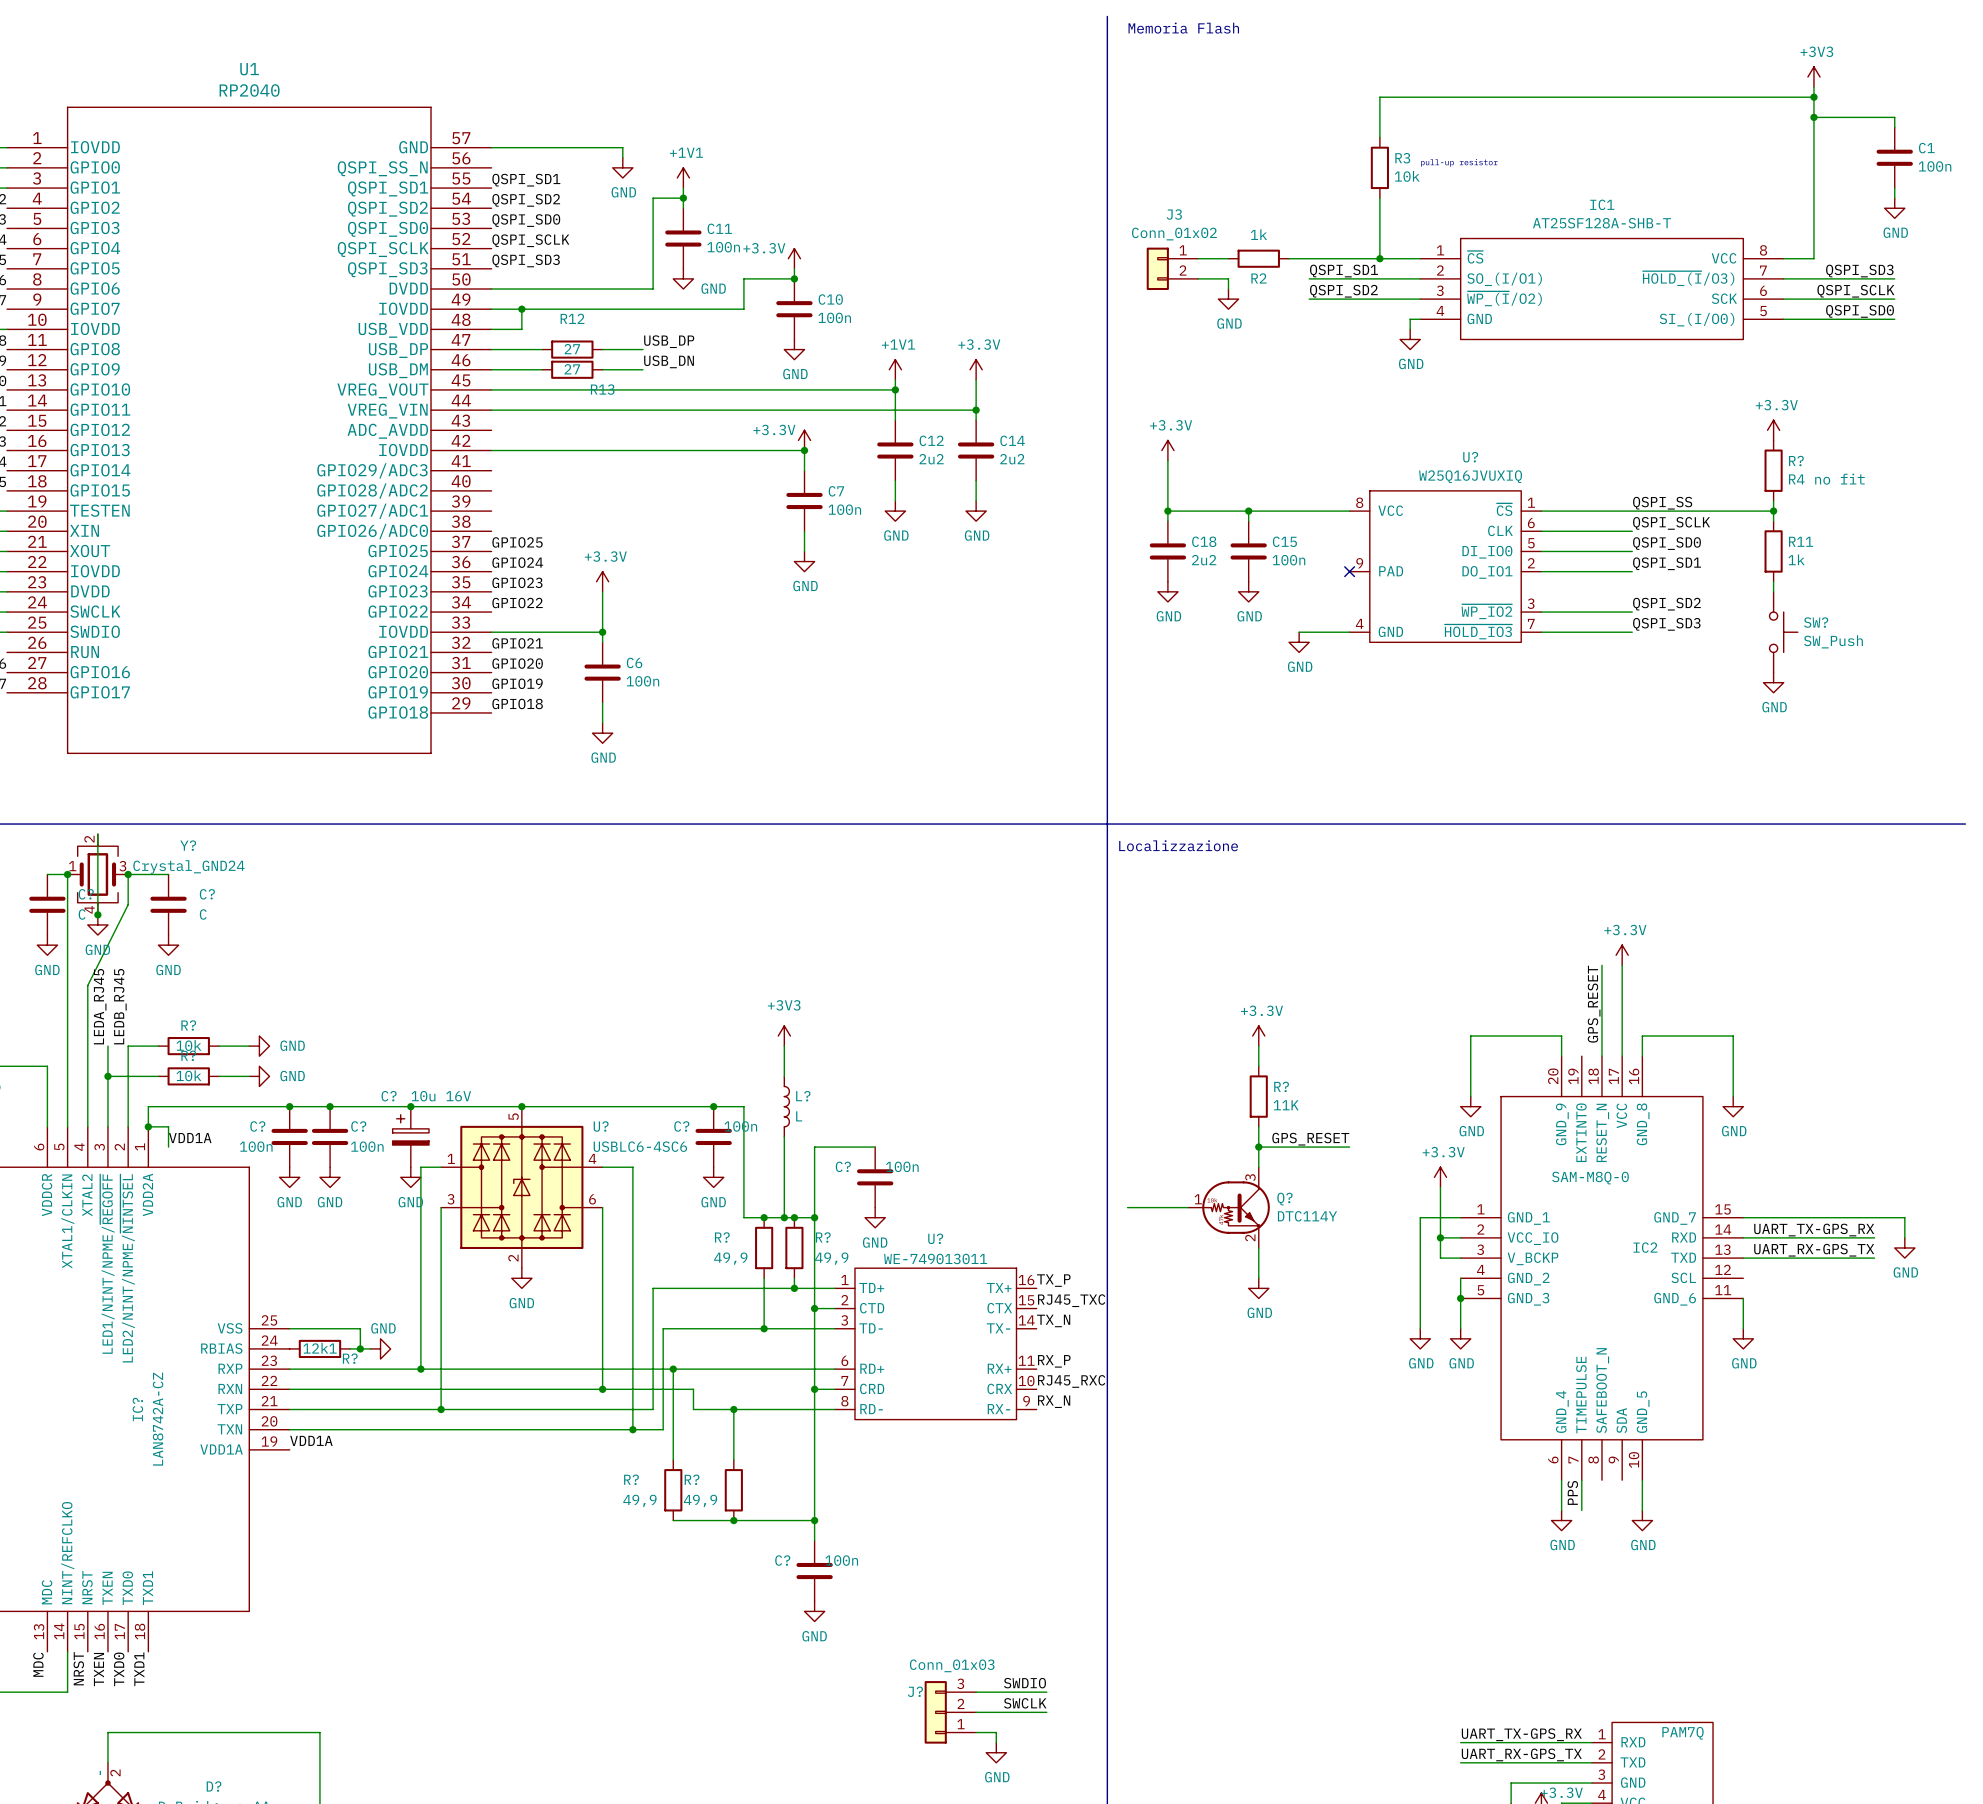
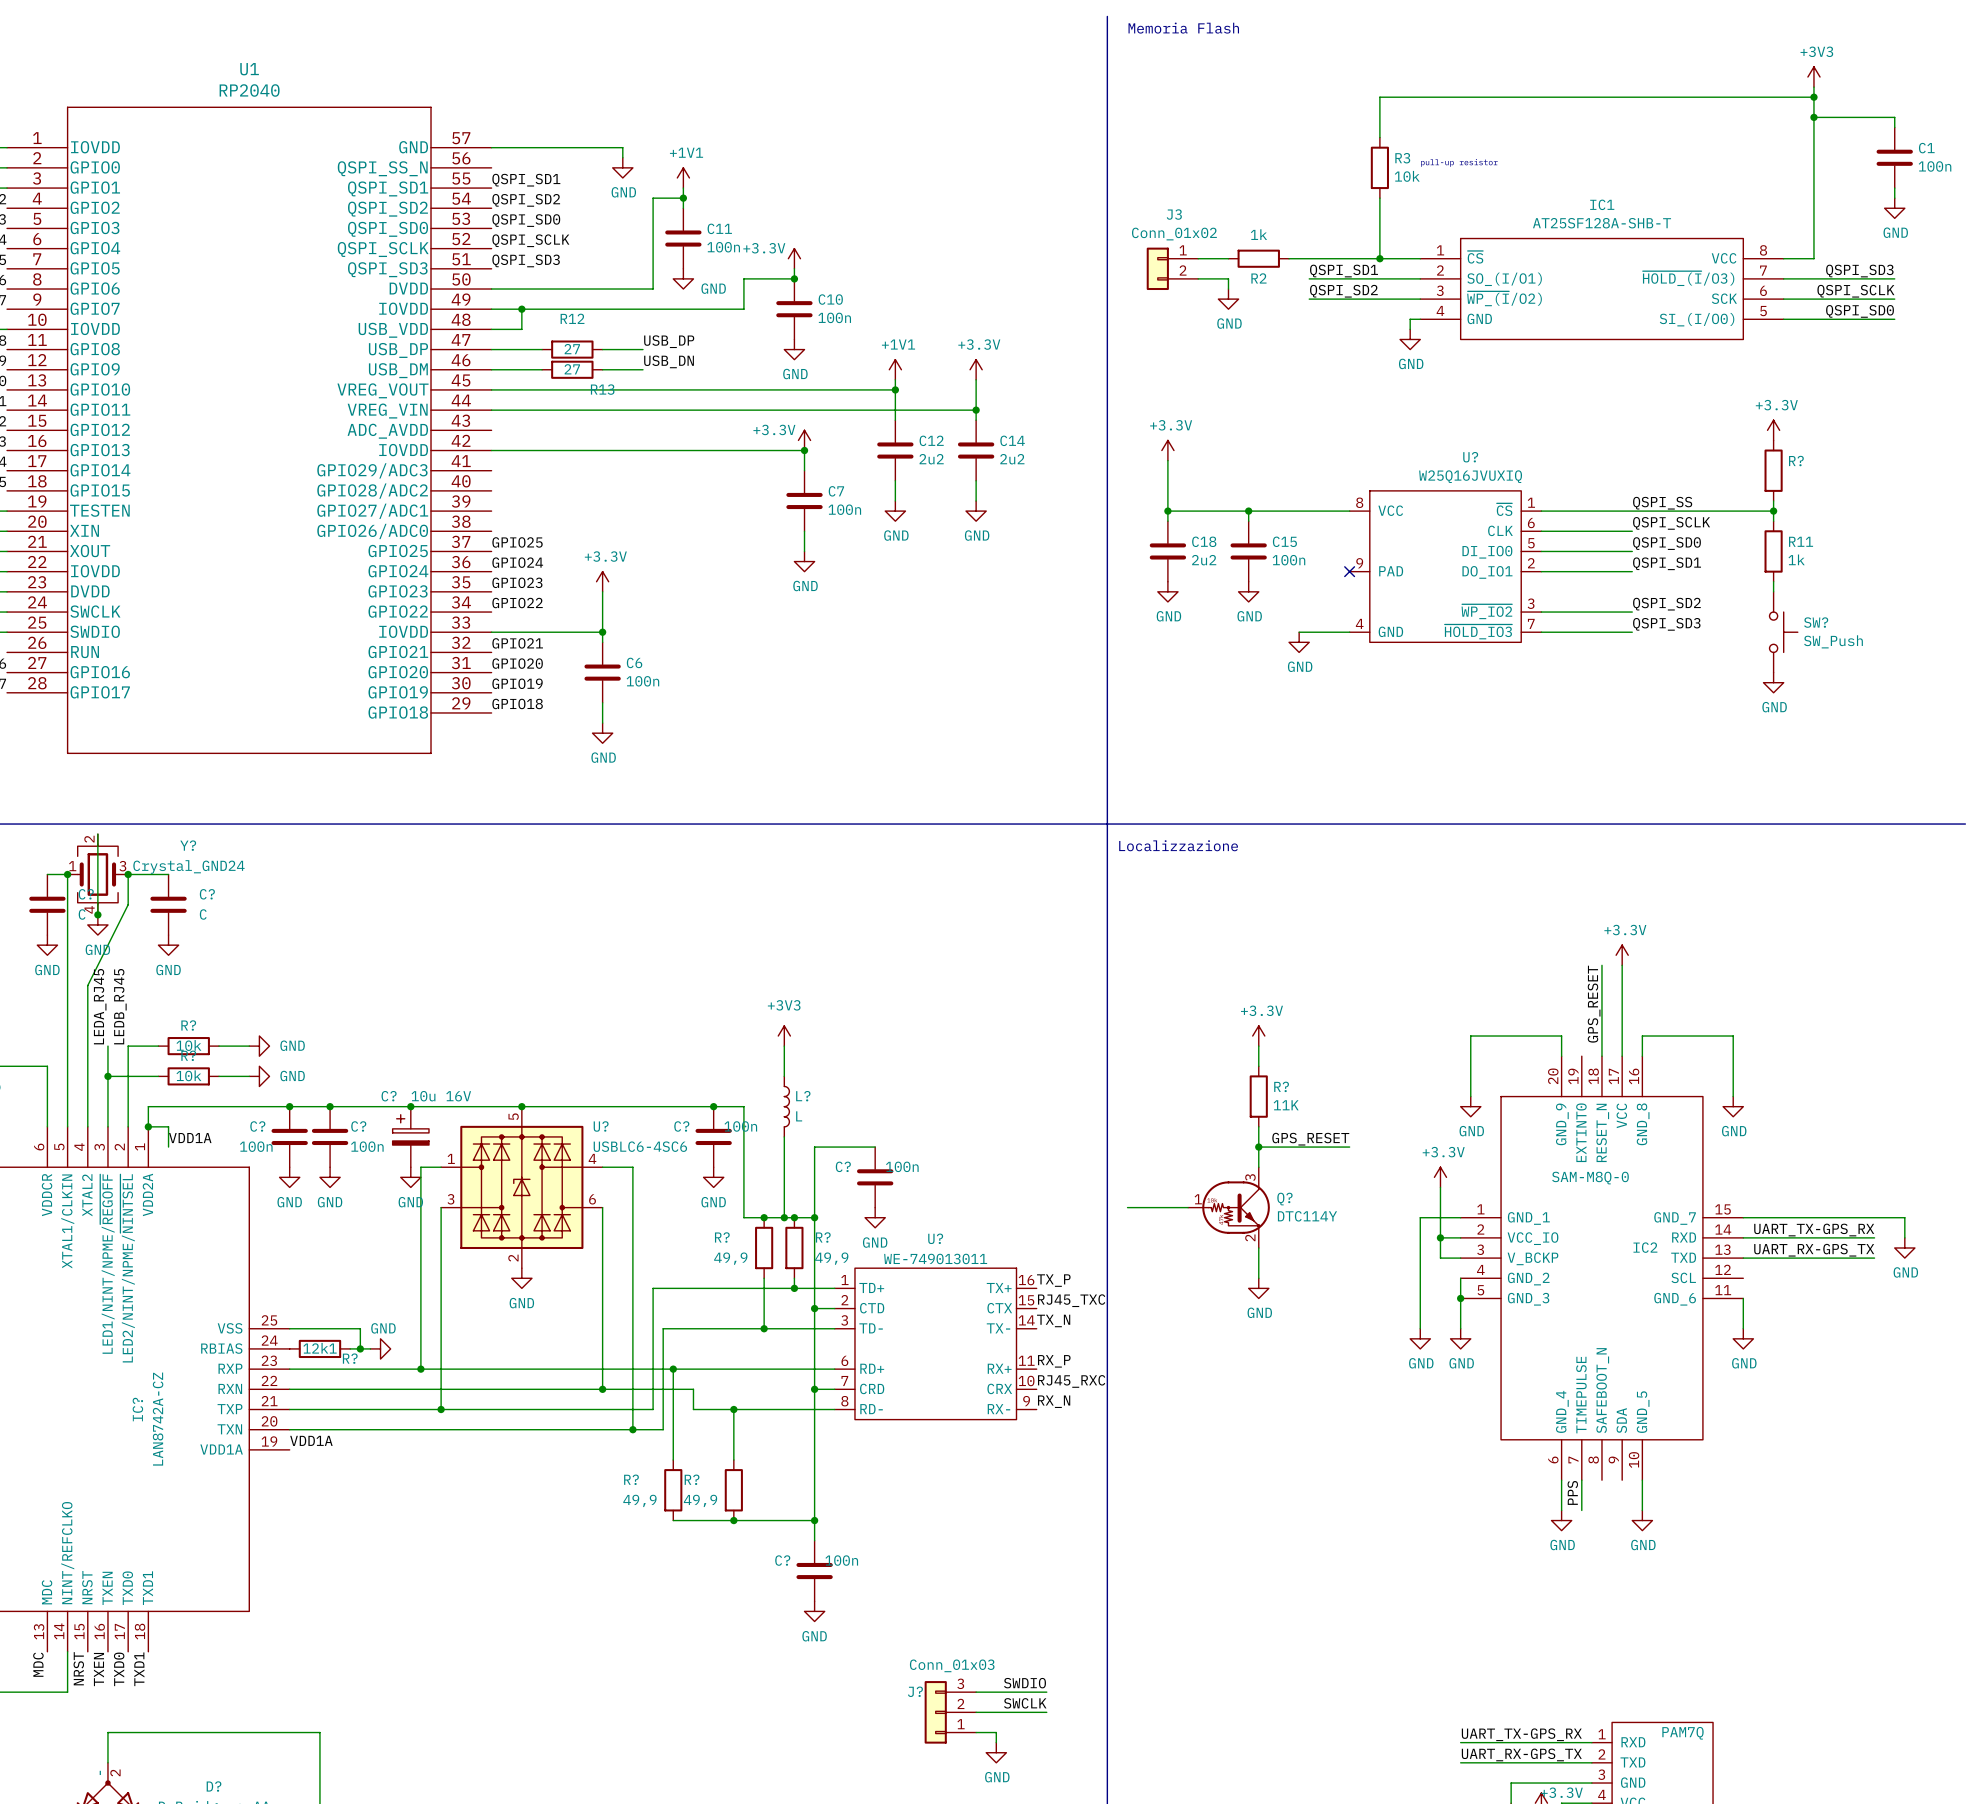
R? value: R4 no fit (1826, 479) -> none

